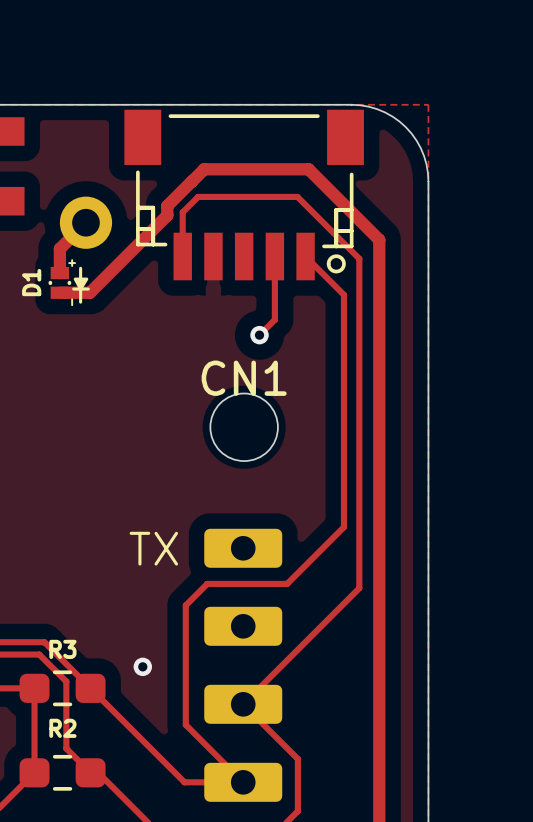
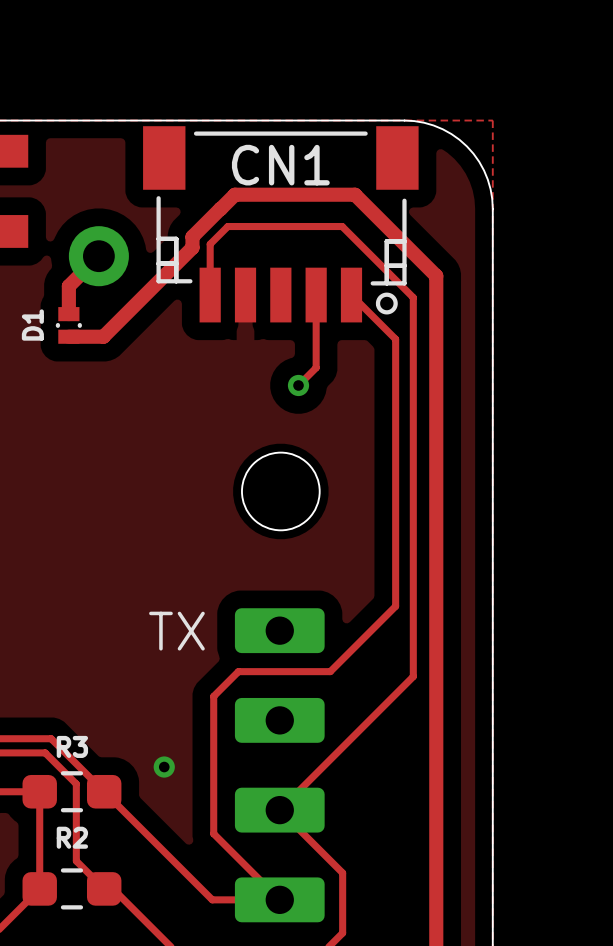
D1 footprint: [48, 266, 90, 304] -> [55, 307, 82, 344]
CN1 name position: CN1 (244, 378) -> CN1 (280, 165)

